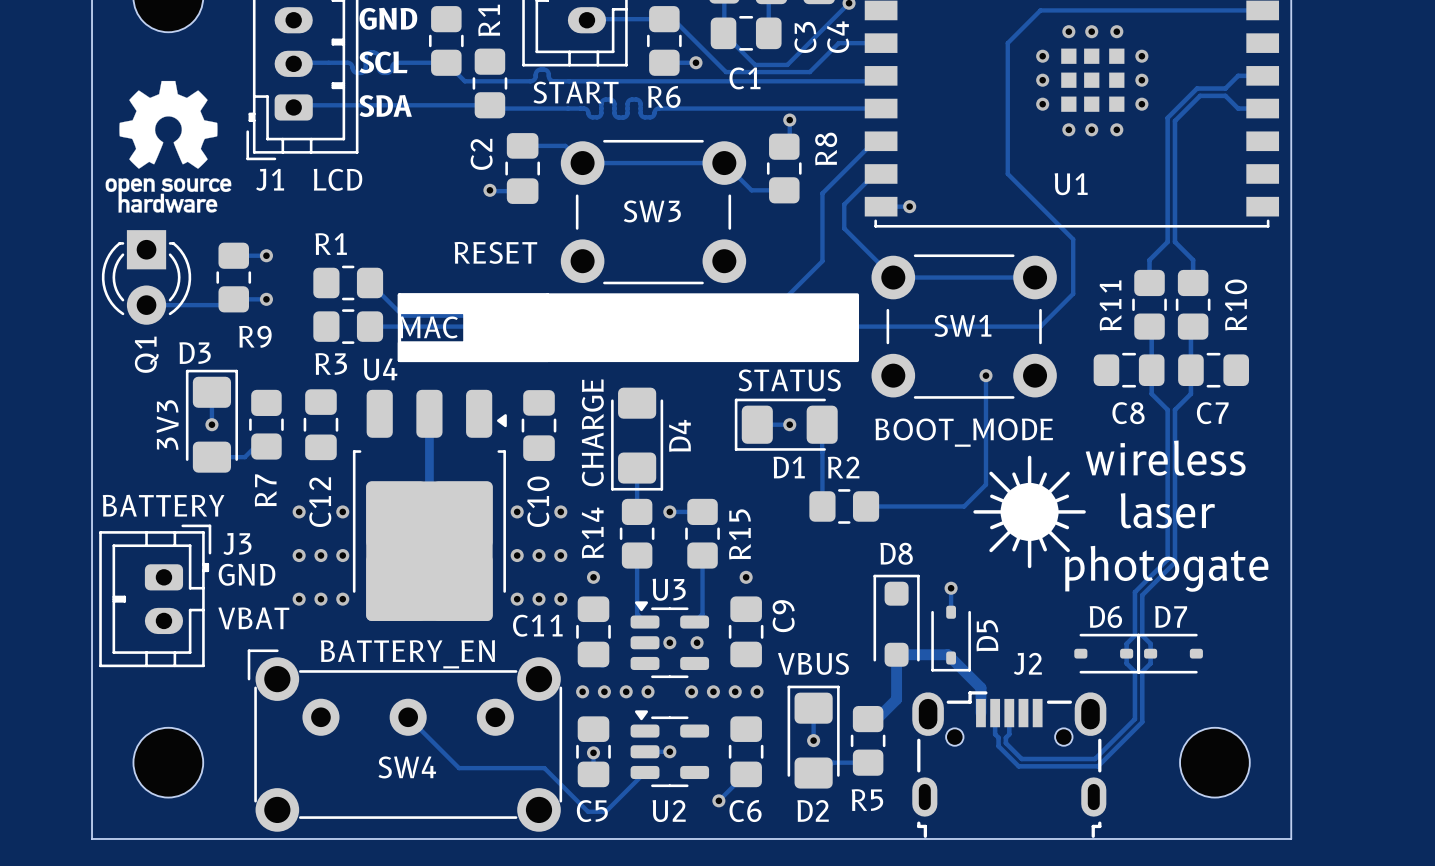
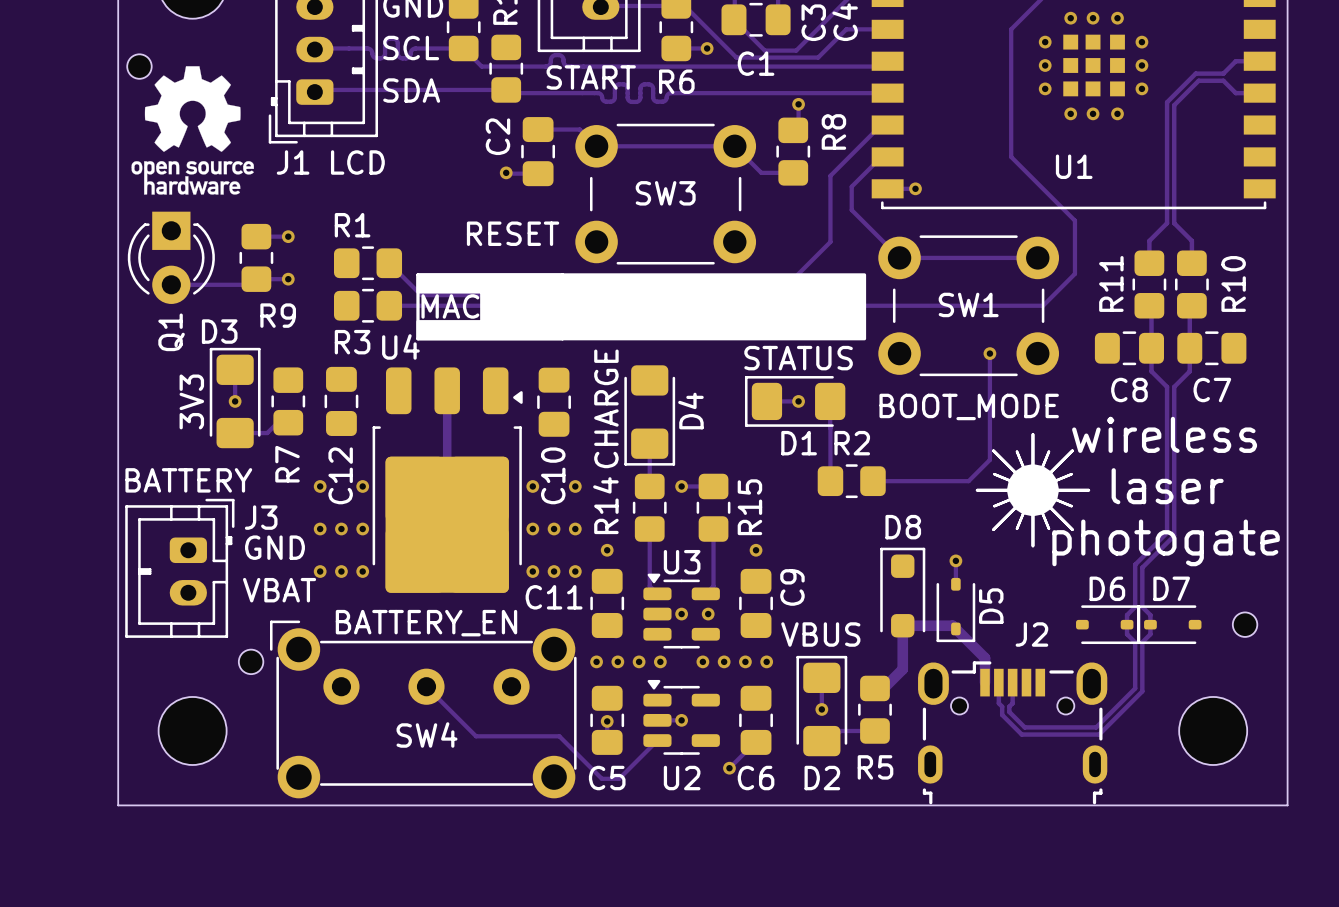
part: none -> (139, 66)
drawing shape: [973, 455, 1086, 569] -> [975, 433, 1091, 548]
part: none -> (1245, 624)
part: none -> (251, 661)

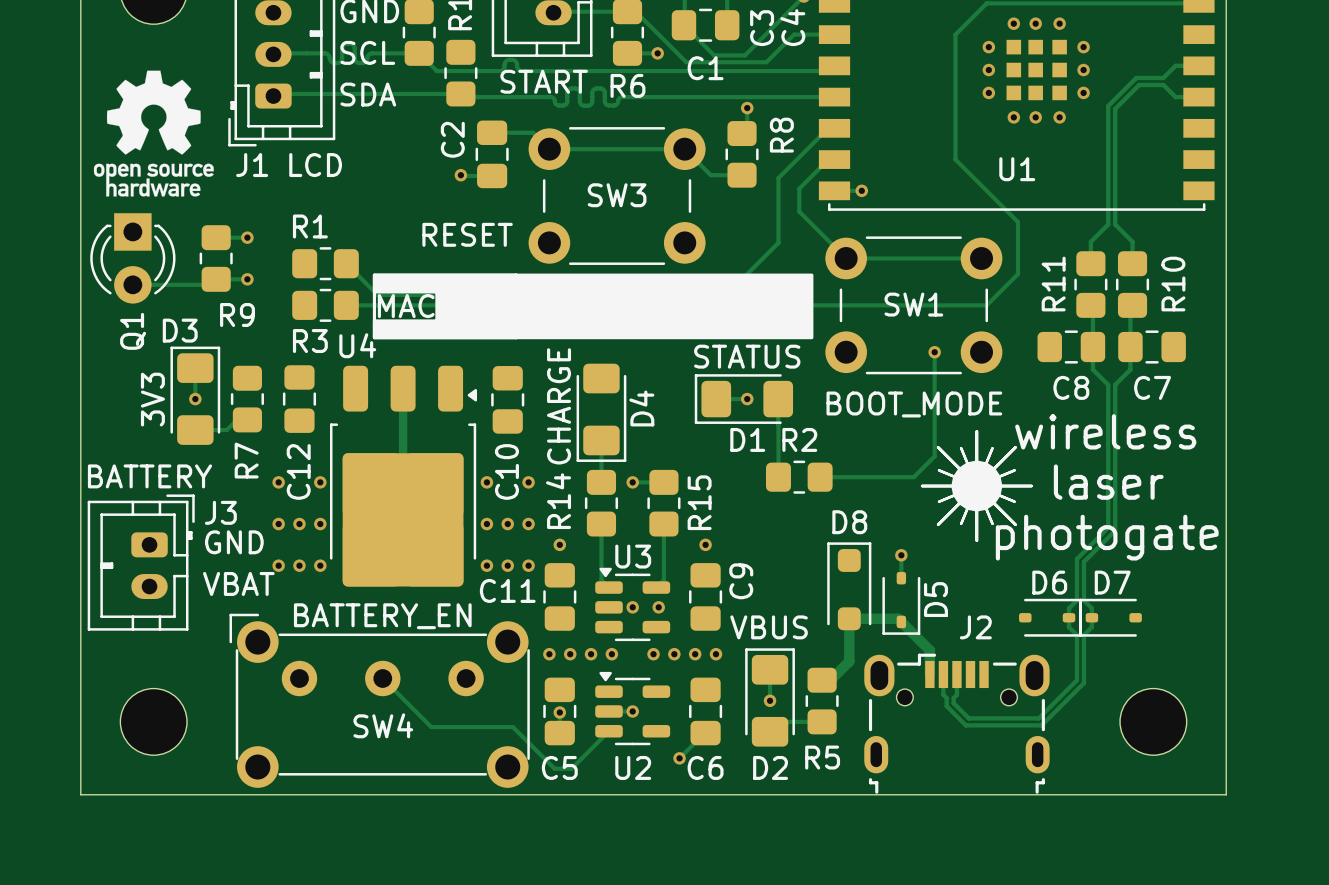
part: (139, 66) -> none
part: (1245, 624) -> none
part: (251, 661) -> none

